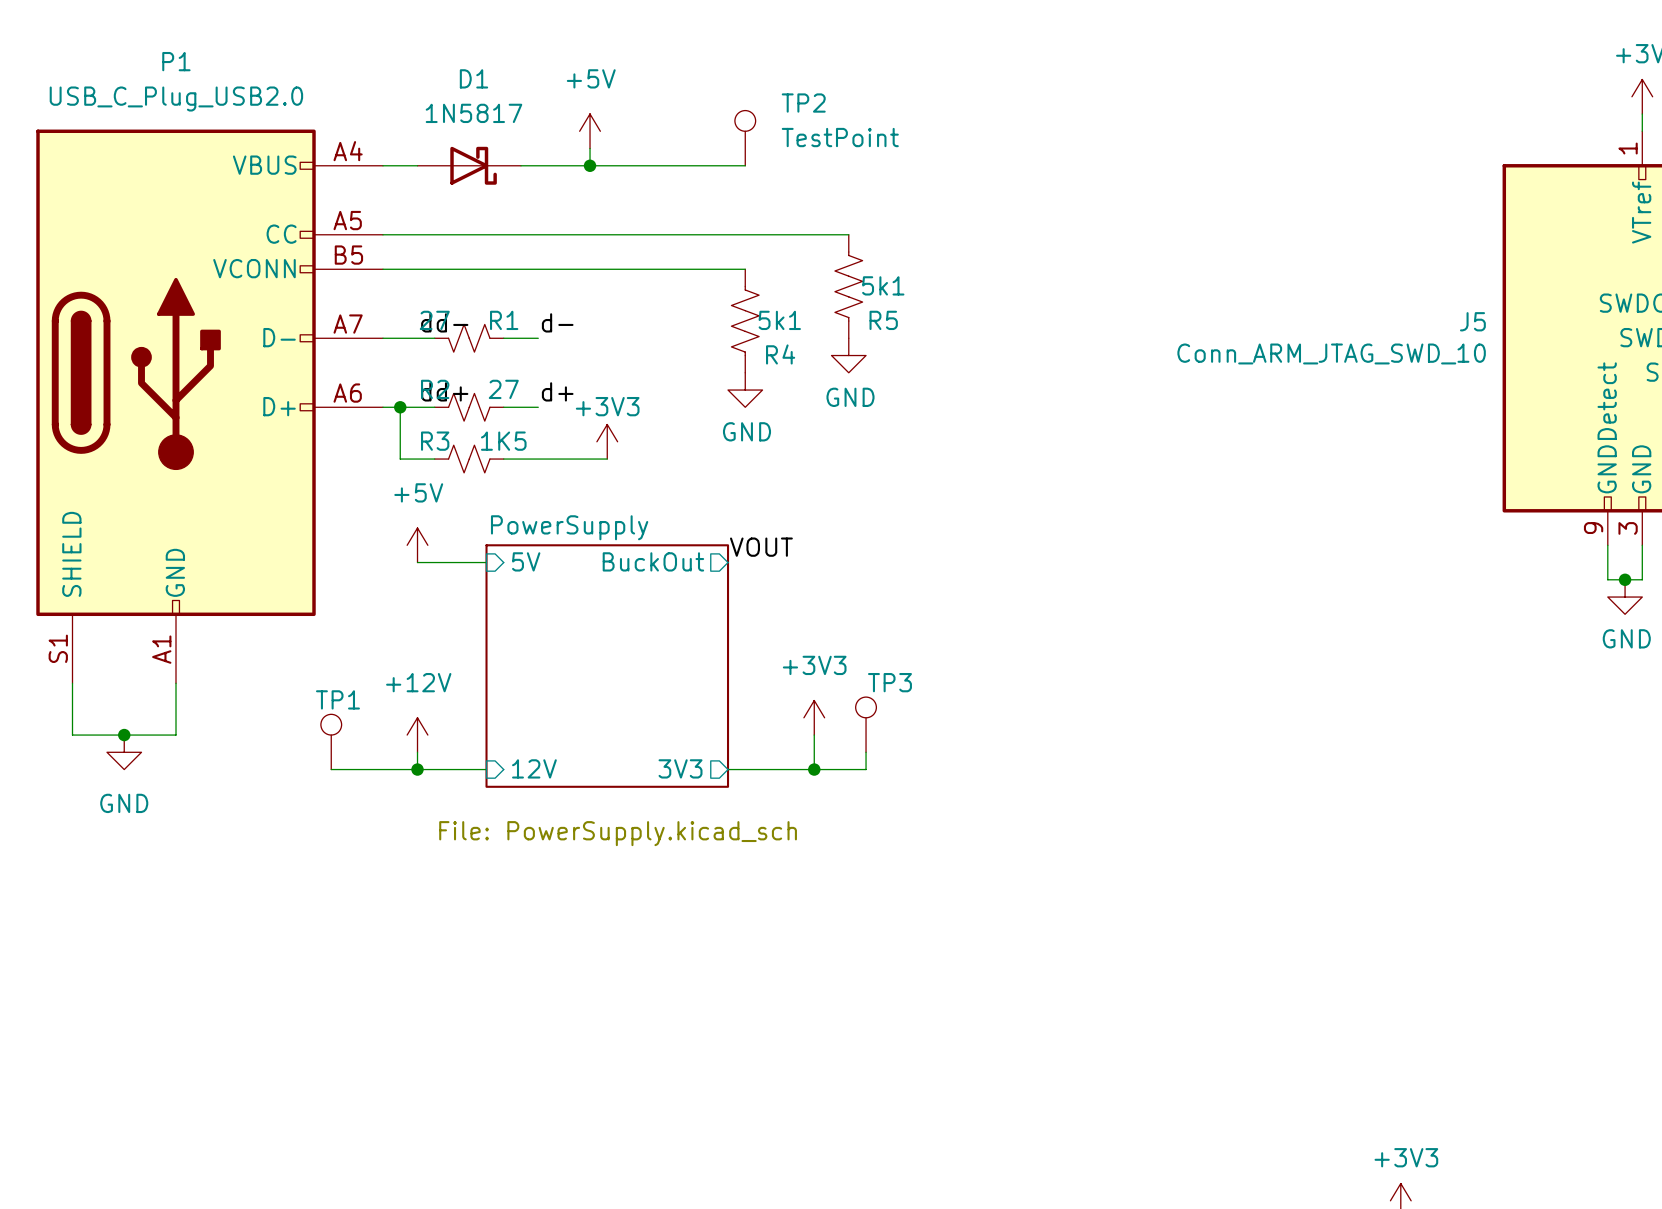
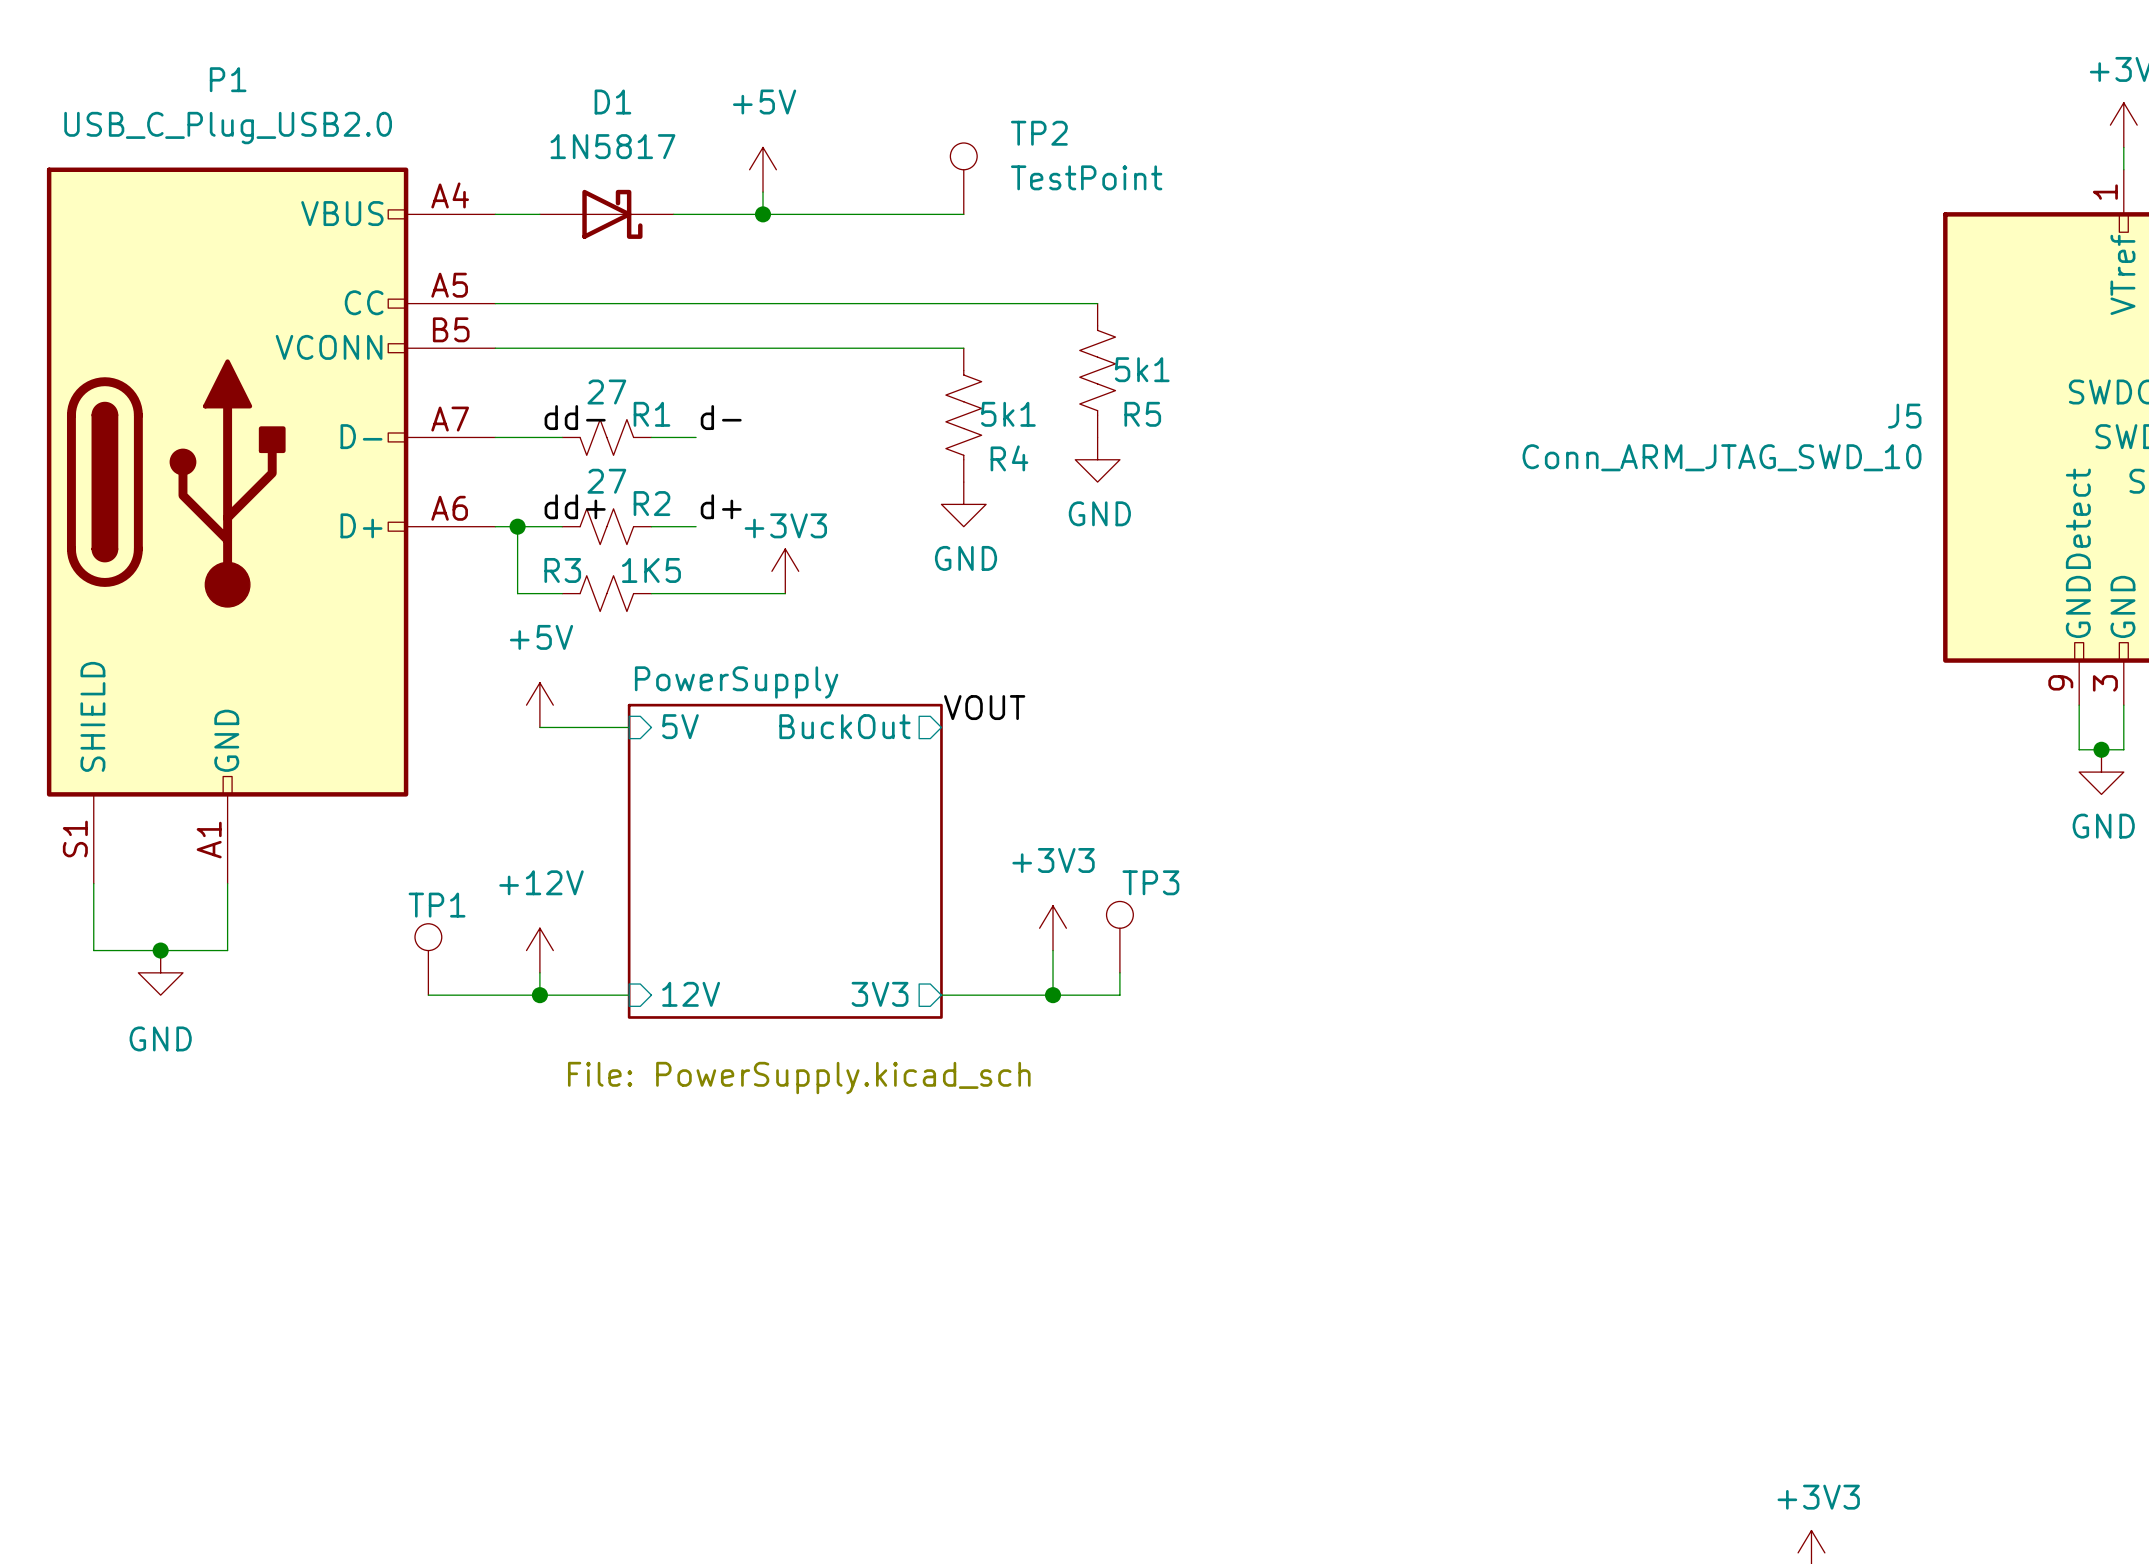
R1 value position: 27 (434, 320) -> 27 (606, 392)
R2 name position: R2 (435, 389) -> R2 (651, 503)
R2 value position: 27 (503, 389) -> 27 (606, 481)

